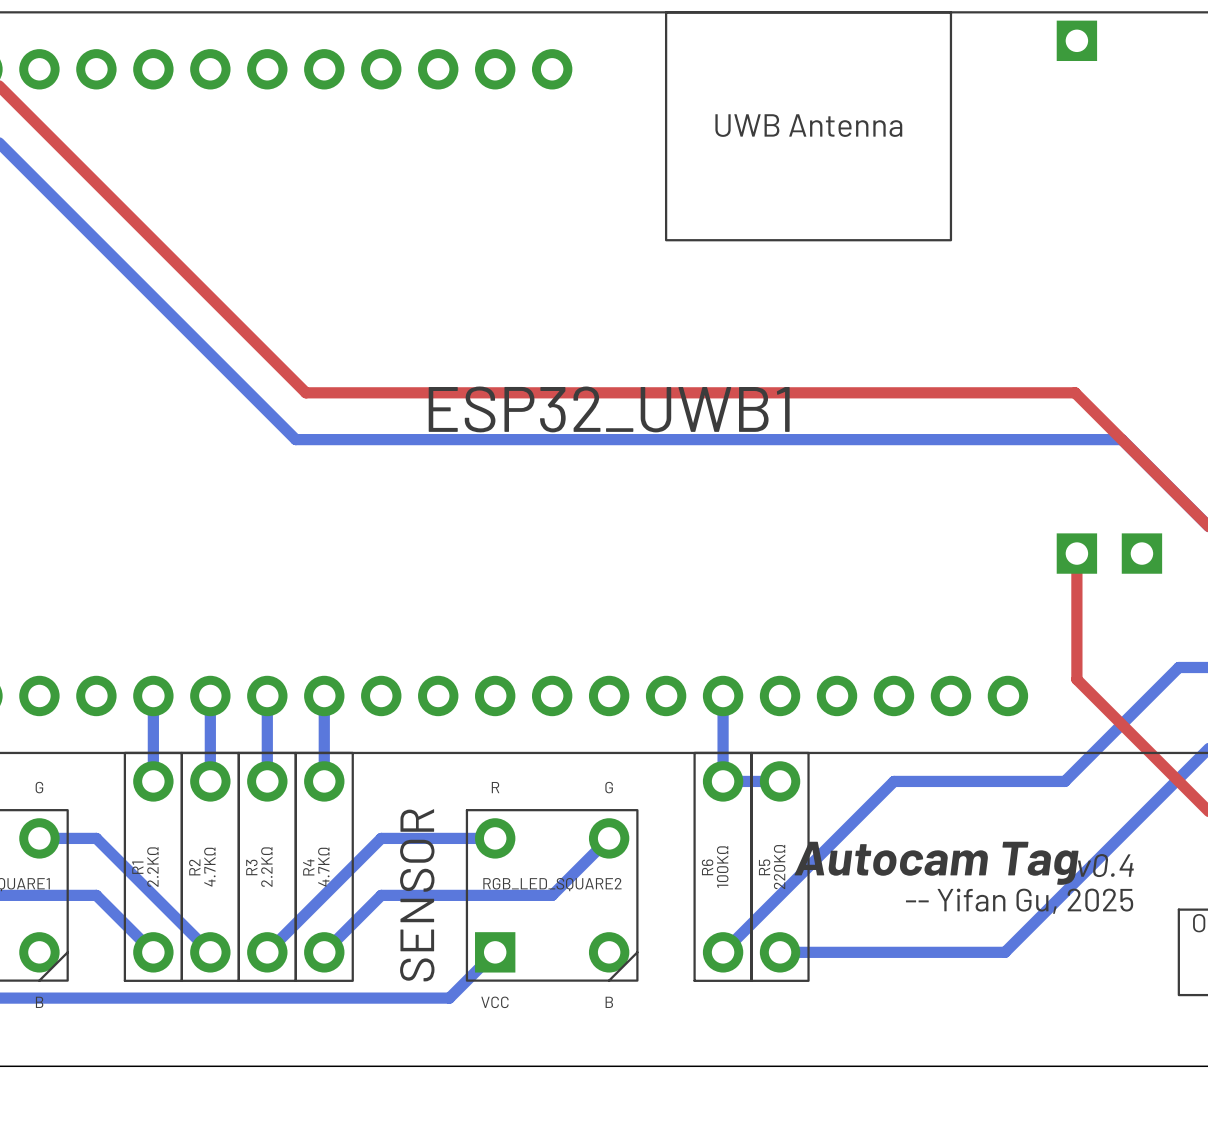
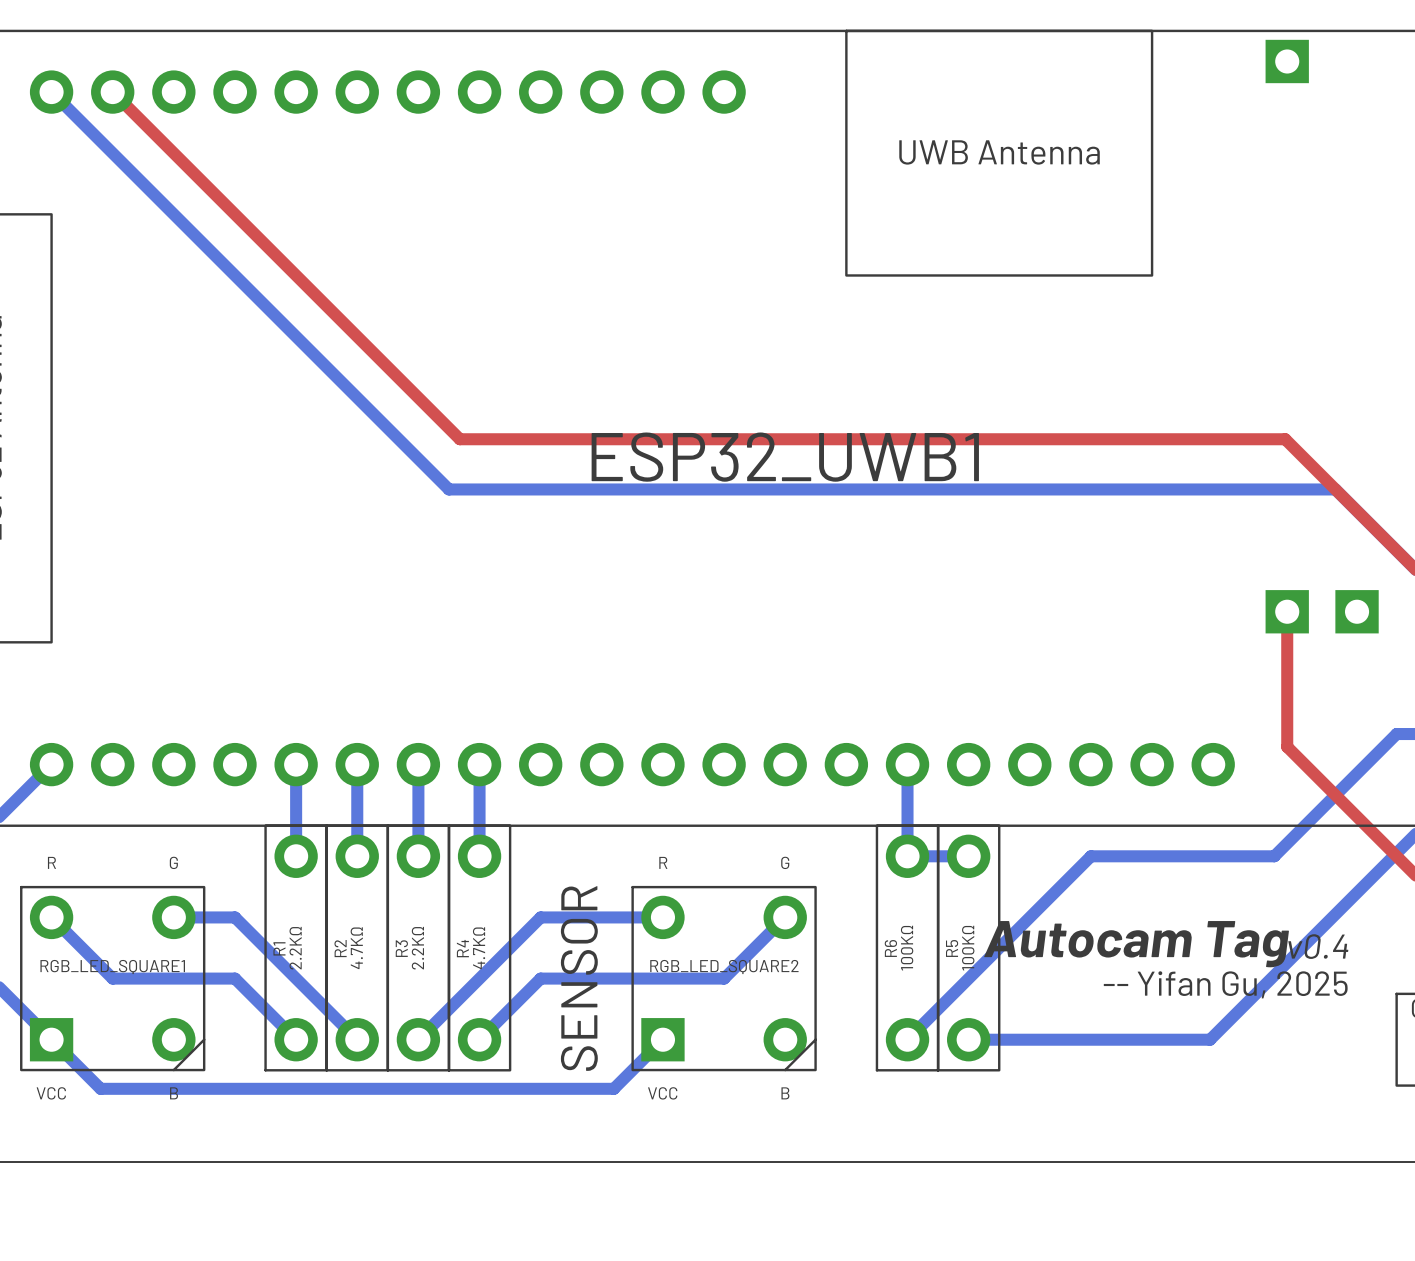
R5 value: 220KΩ (779, 867) -> 100KΩ (968, 948)

